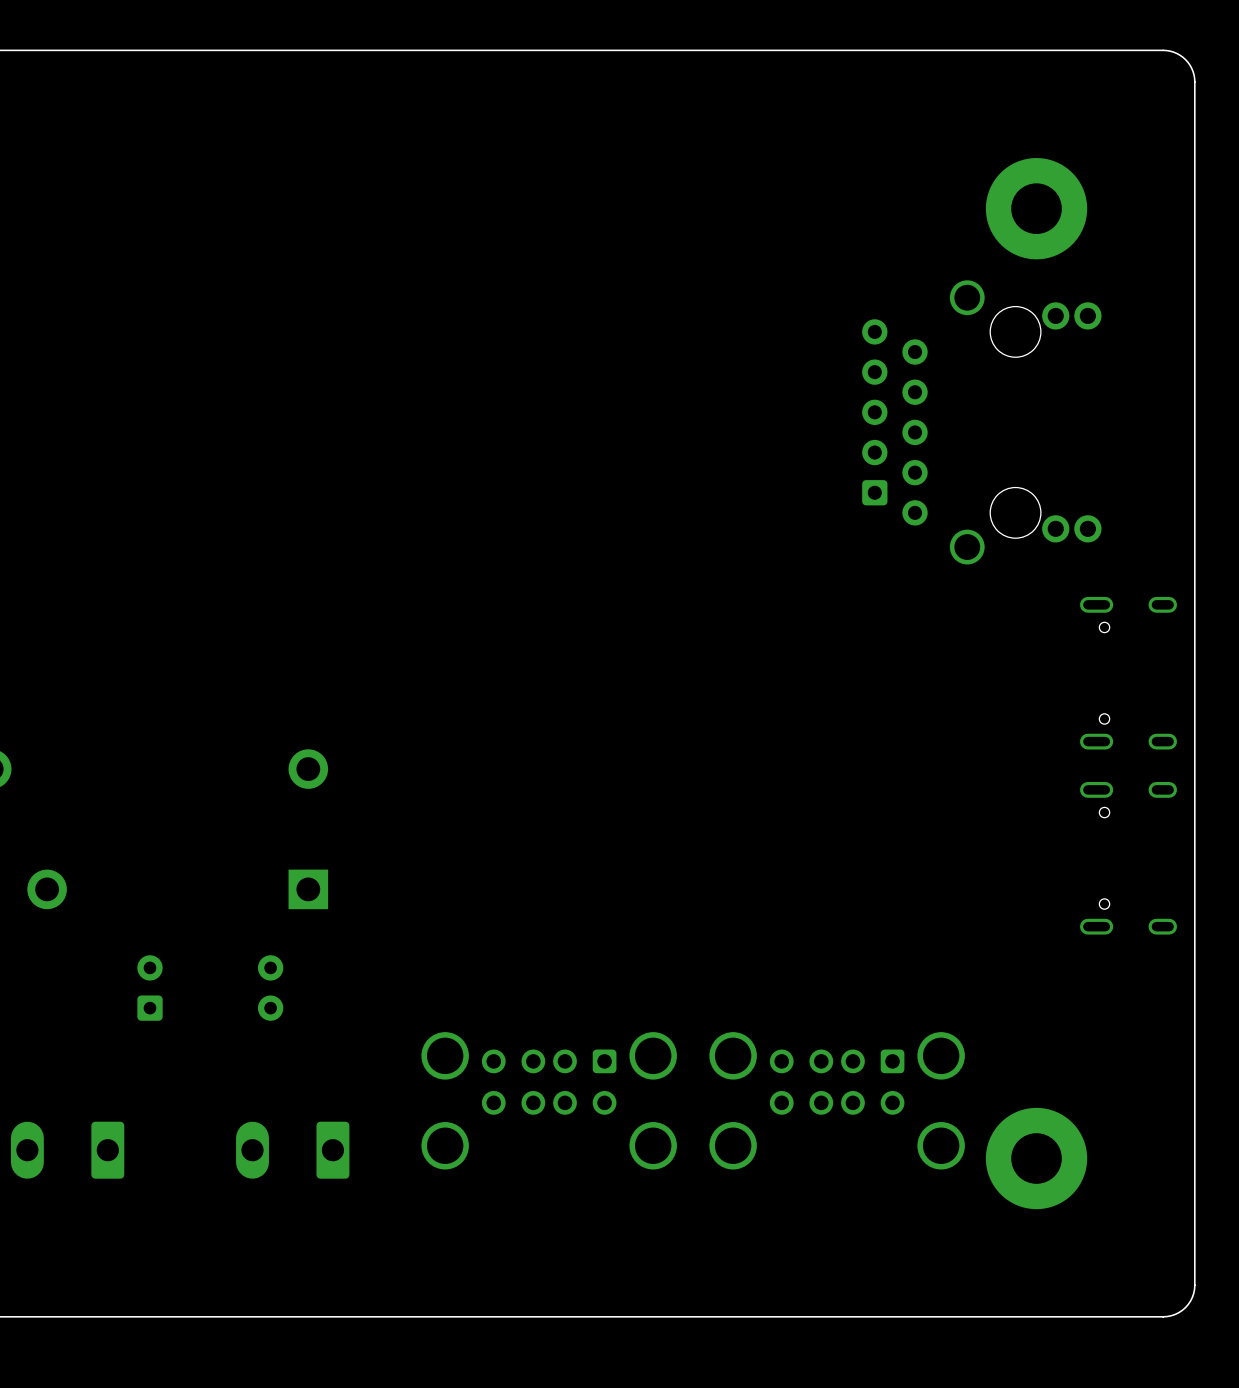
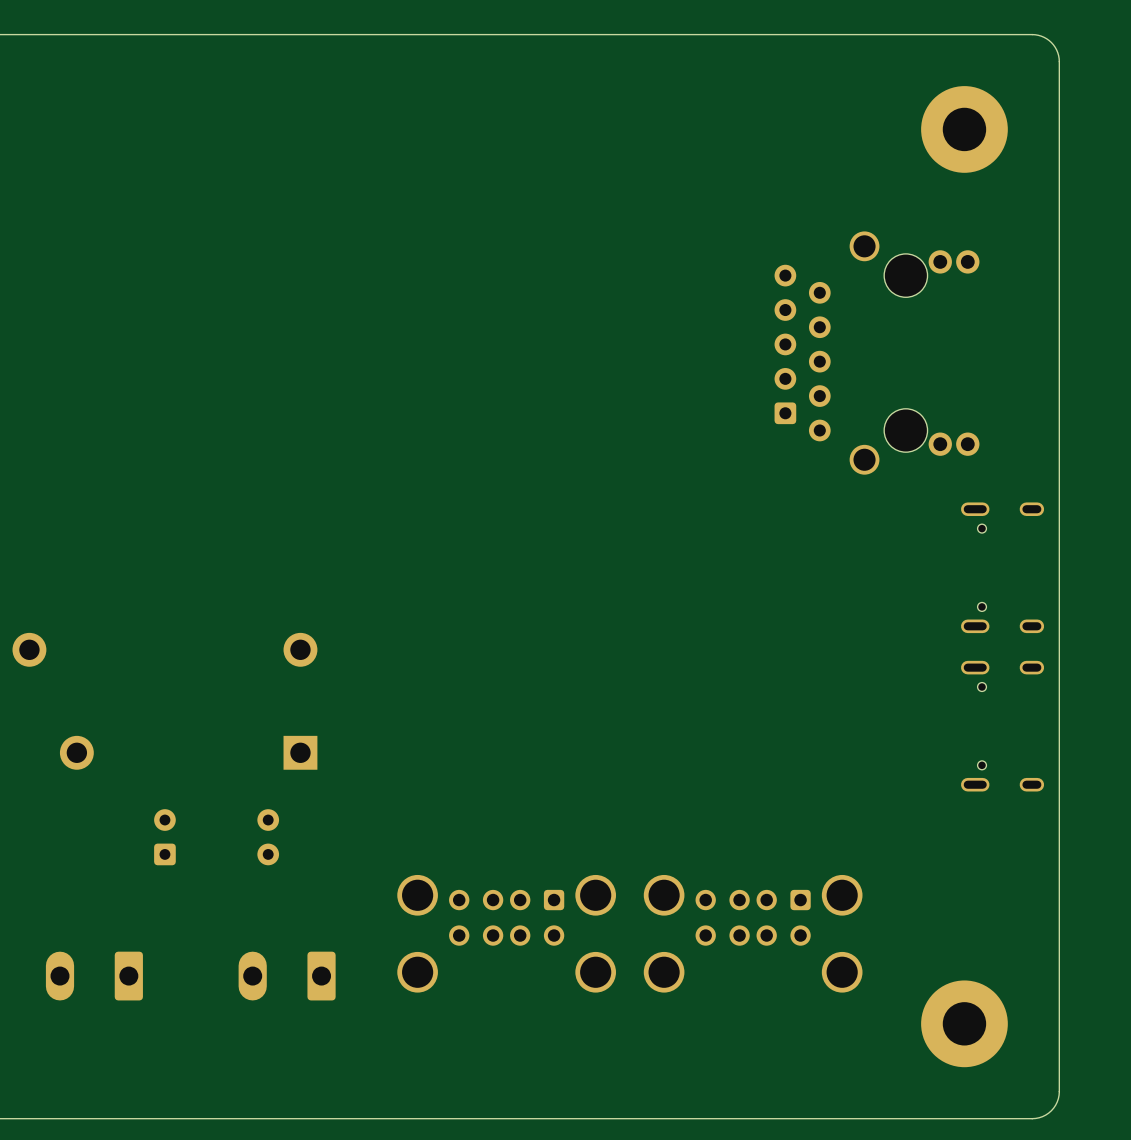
part position: (1036, 208) -> (964, 129)
part position: (1036, 1158) -> (964, 1023)

